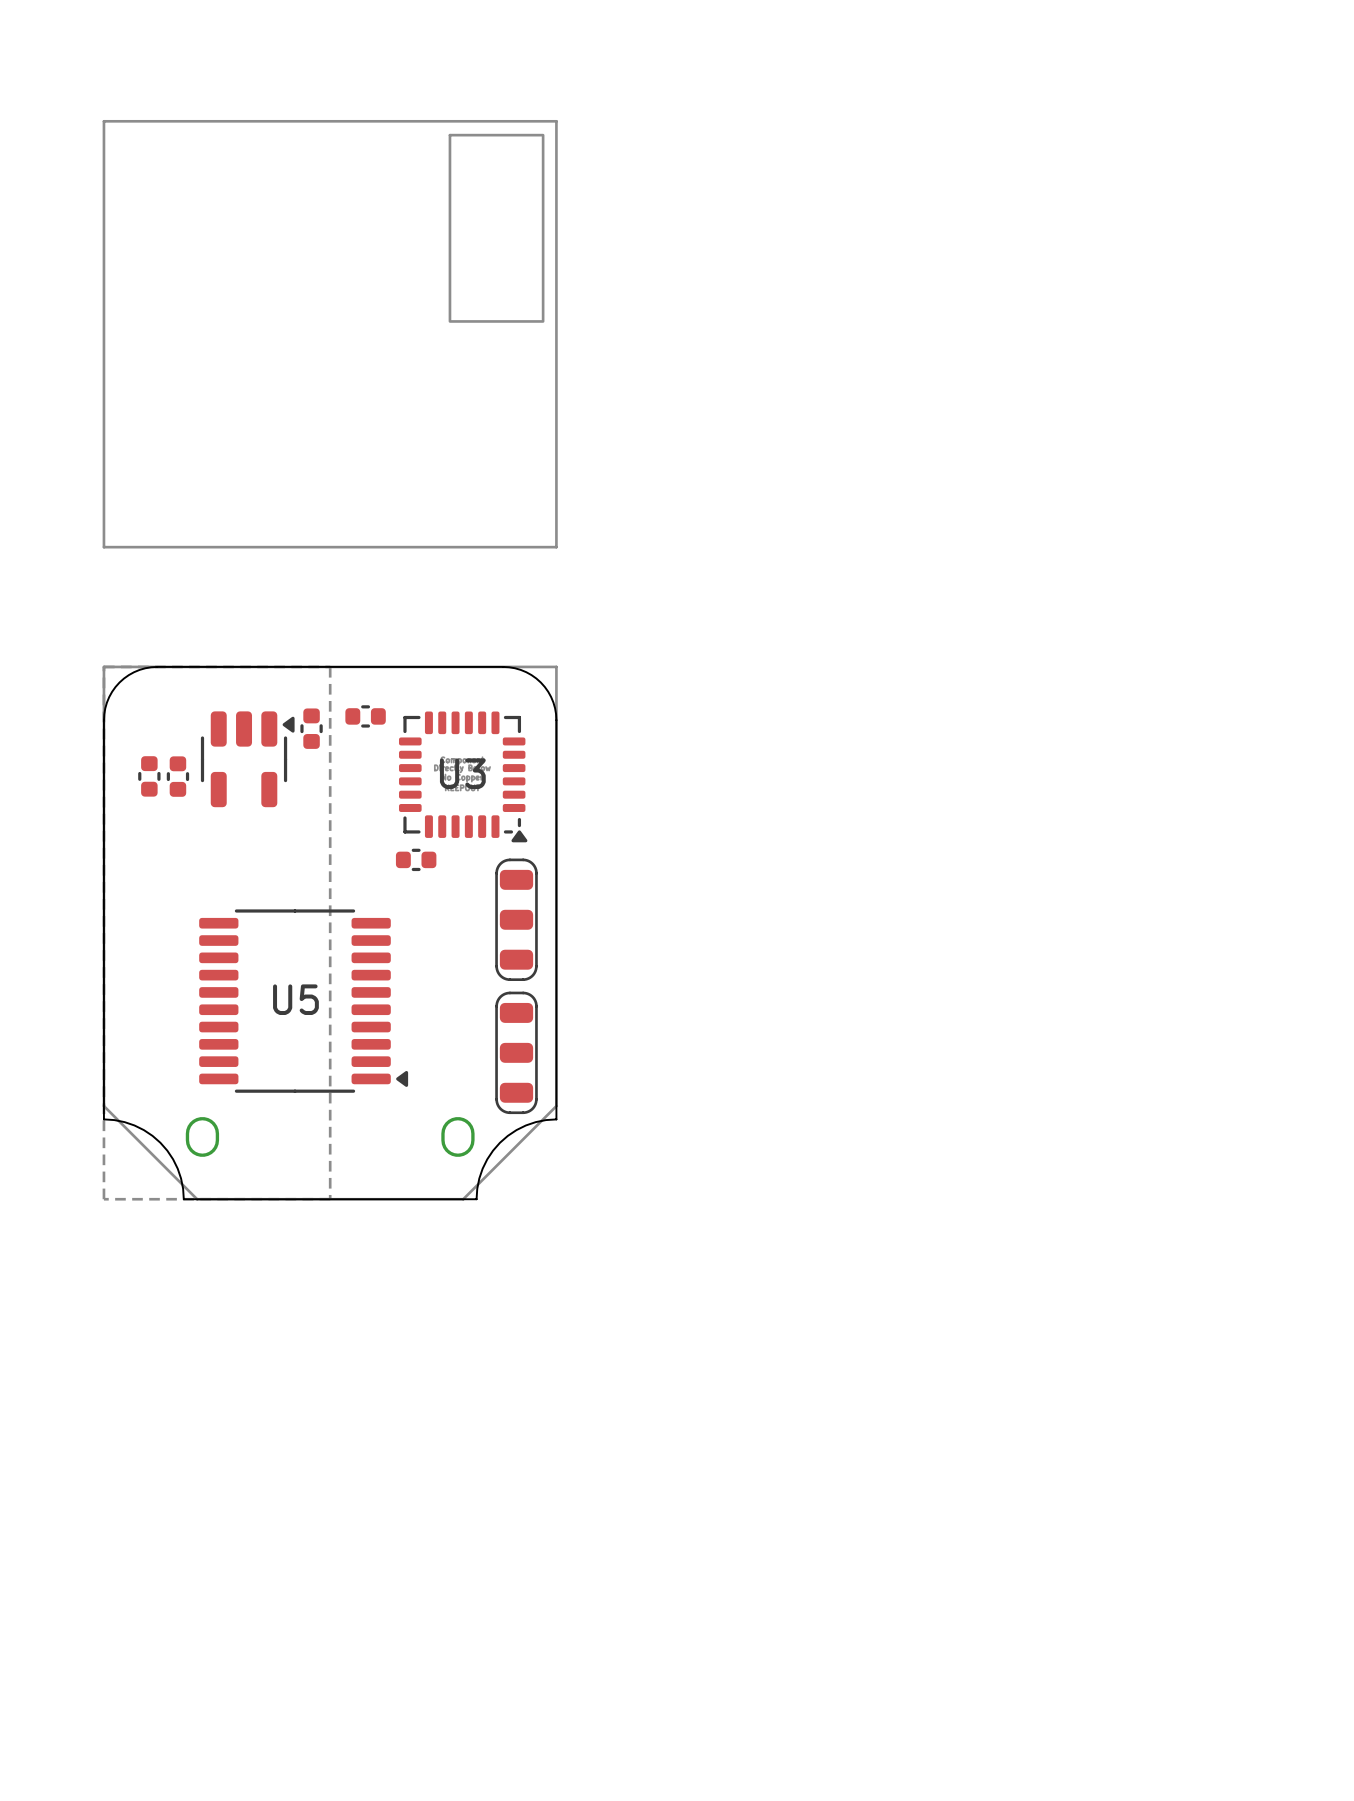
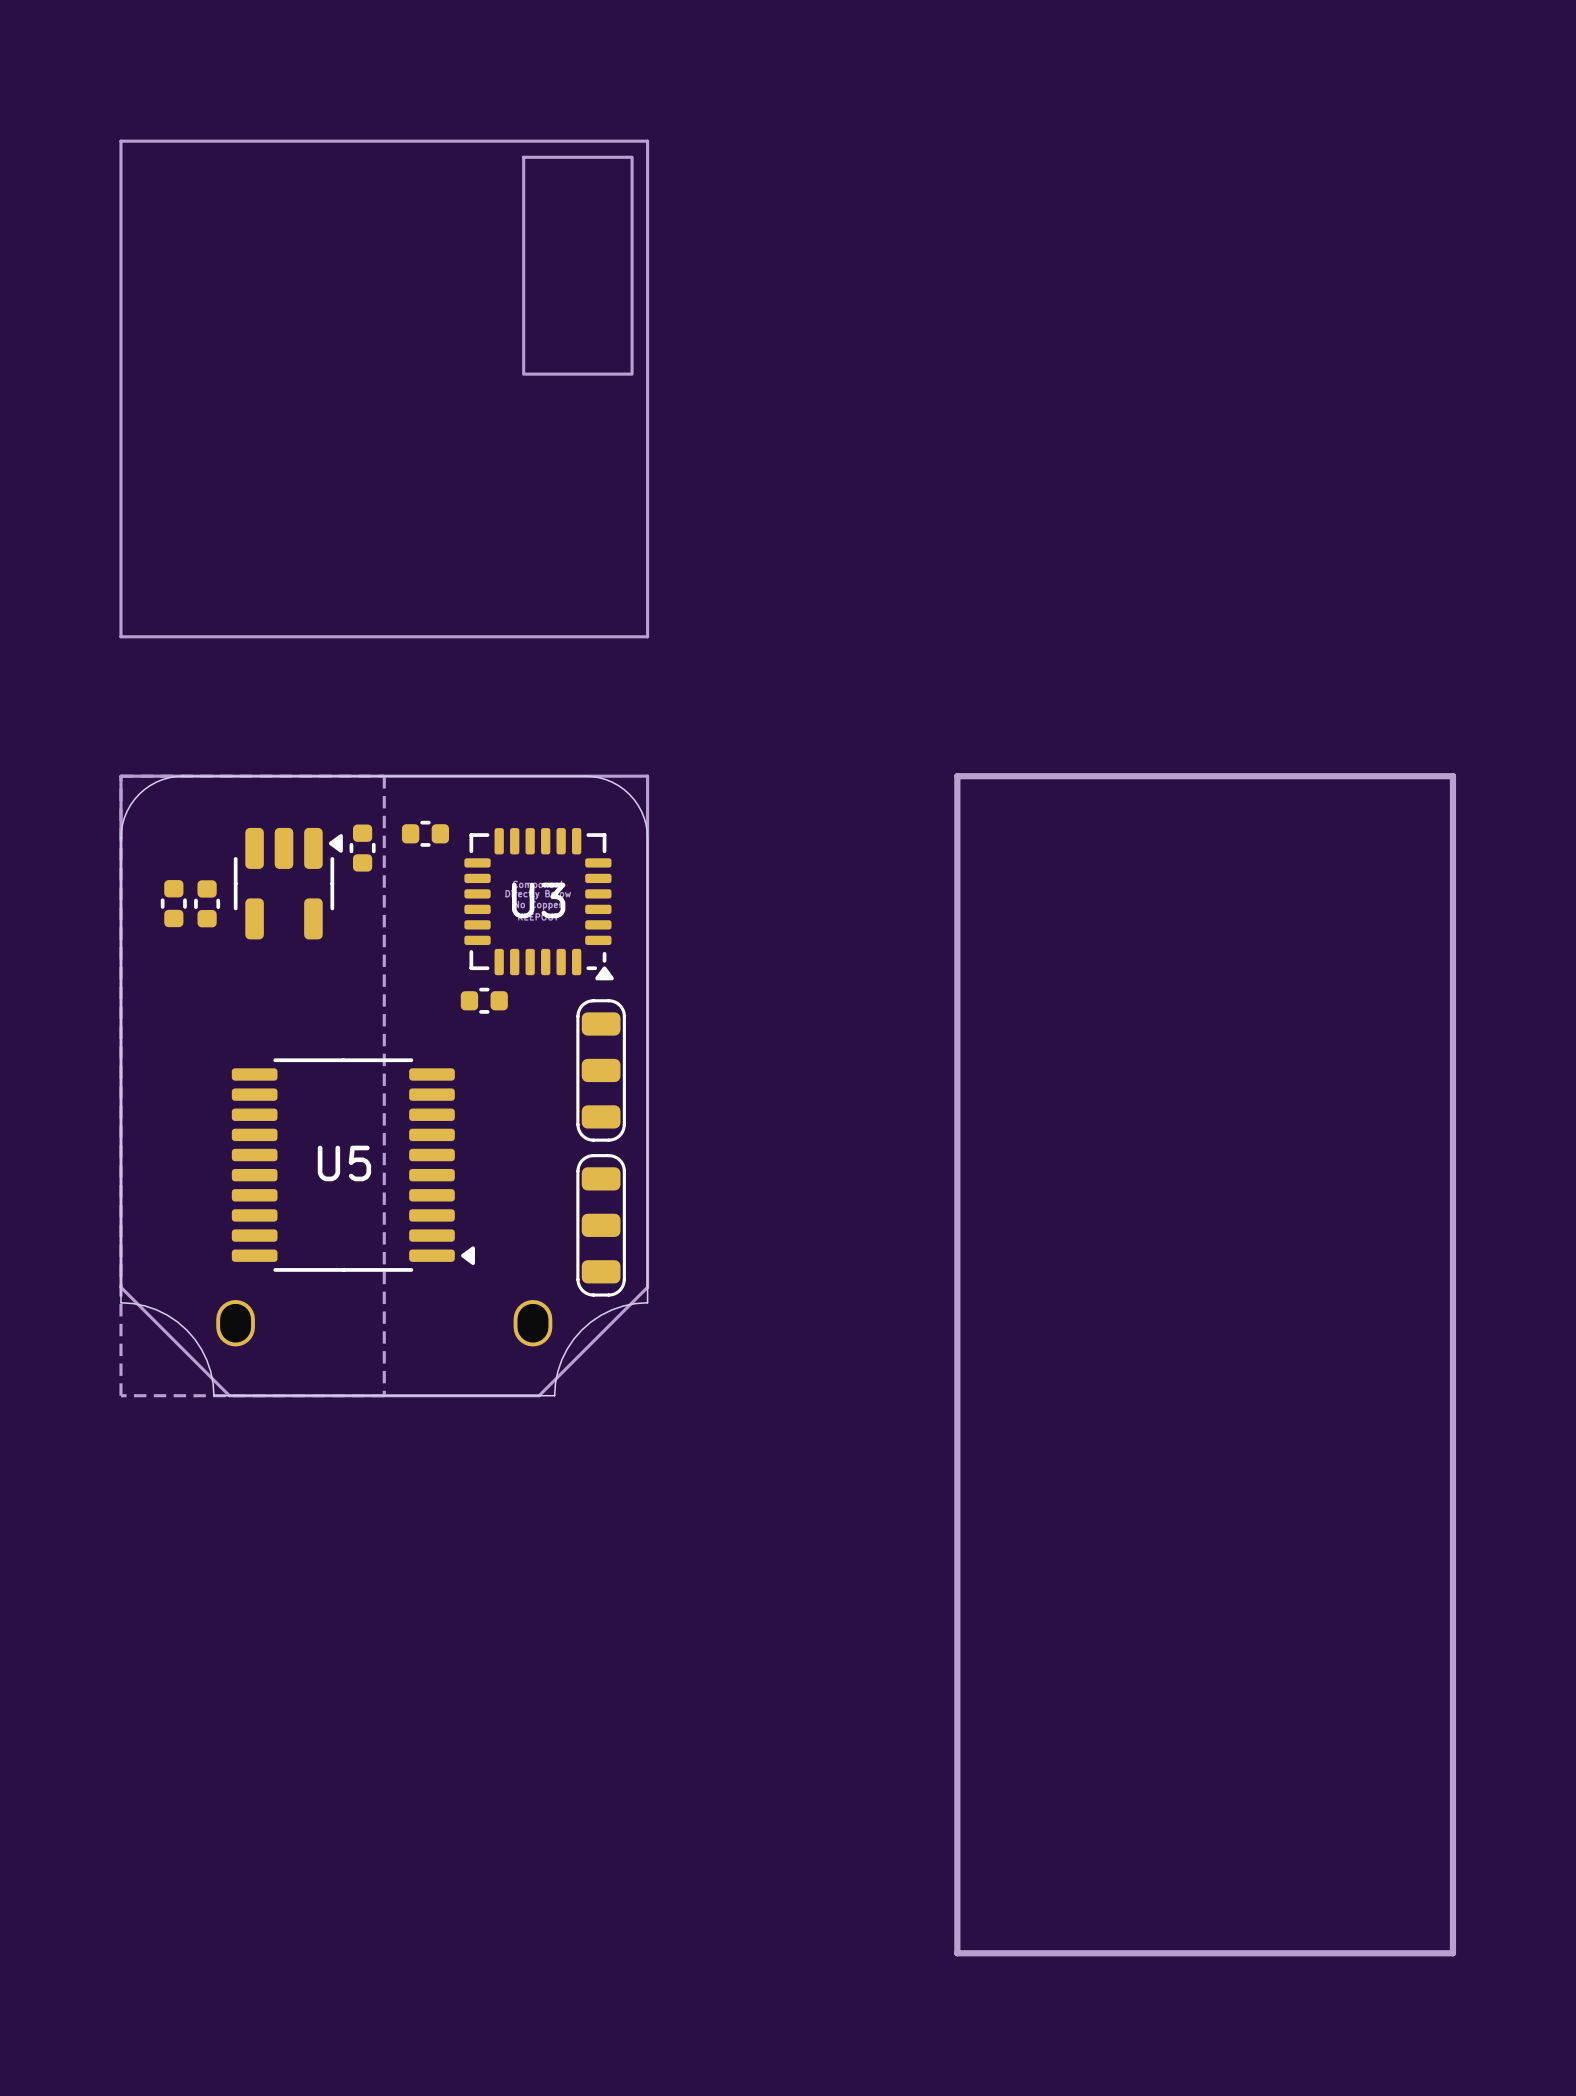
line: none -> (957, 776) (1452, 776) (1452, 1953) (957, 1953) (957, 776)

